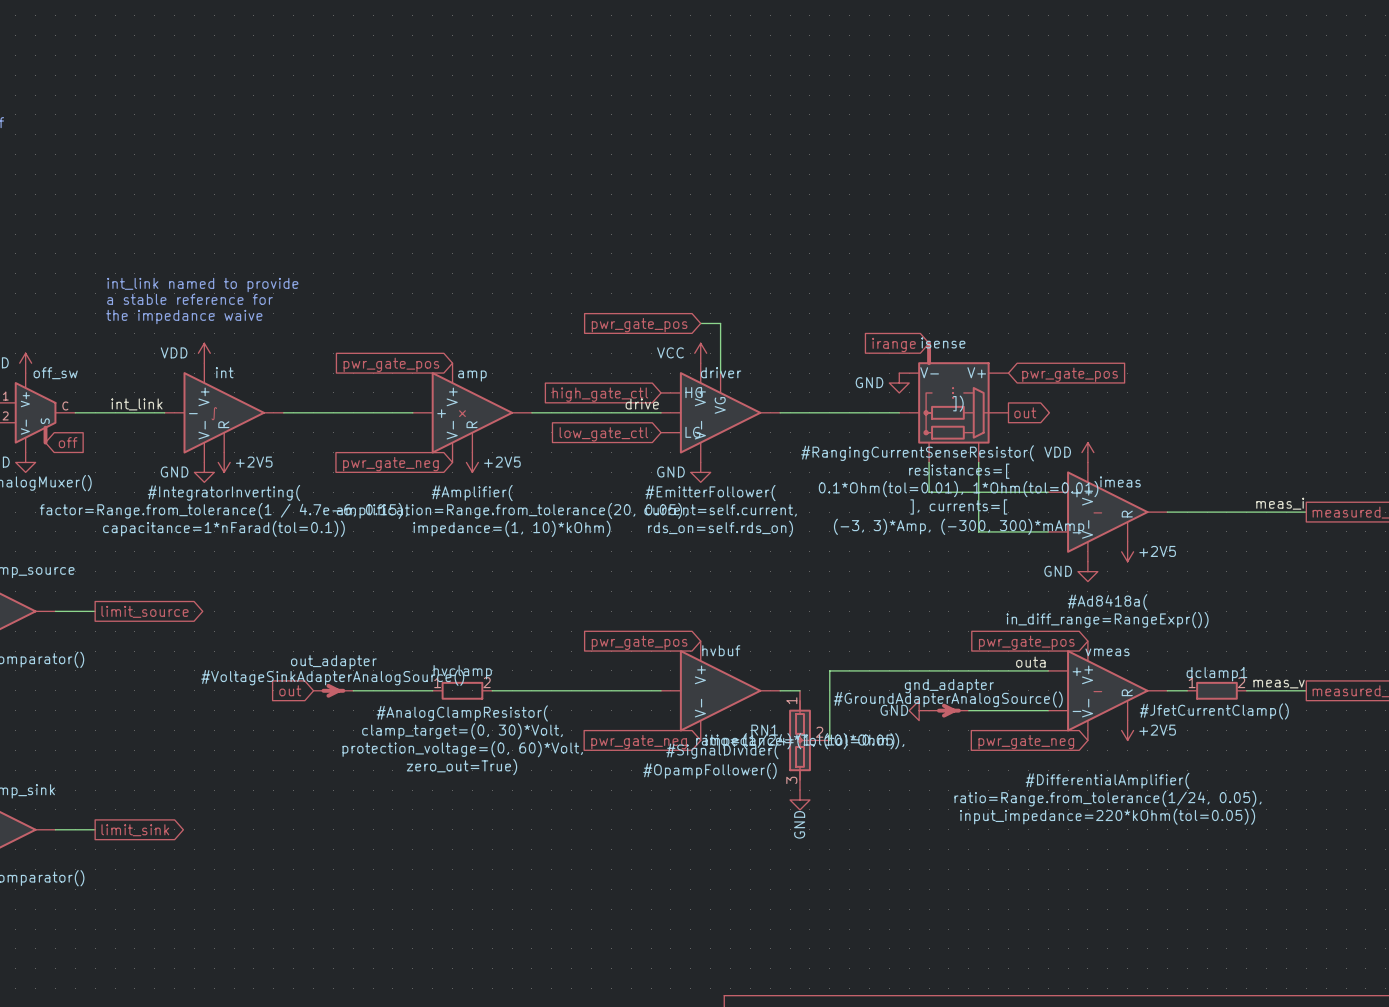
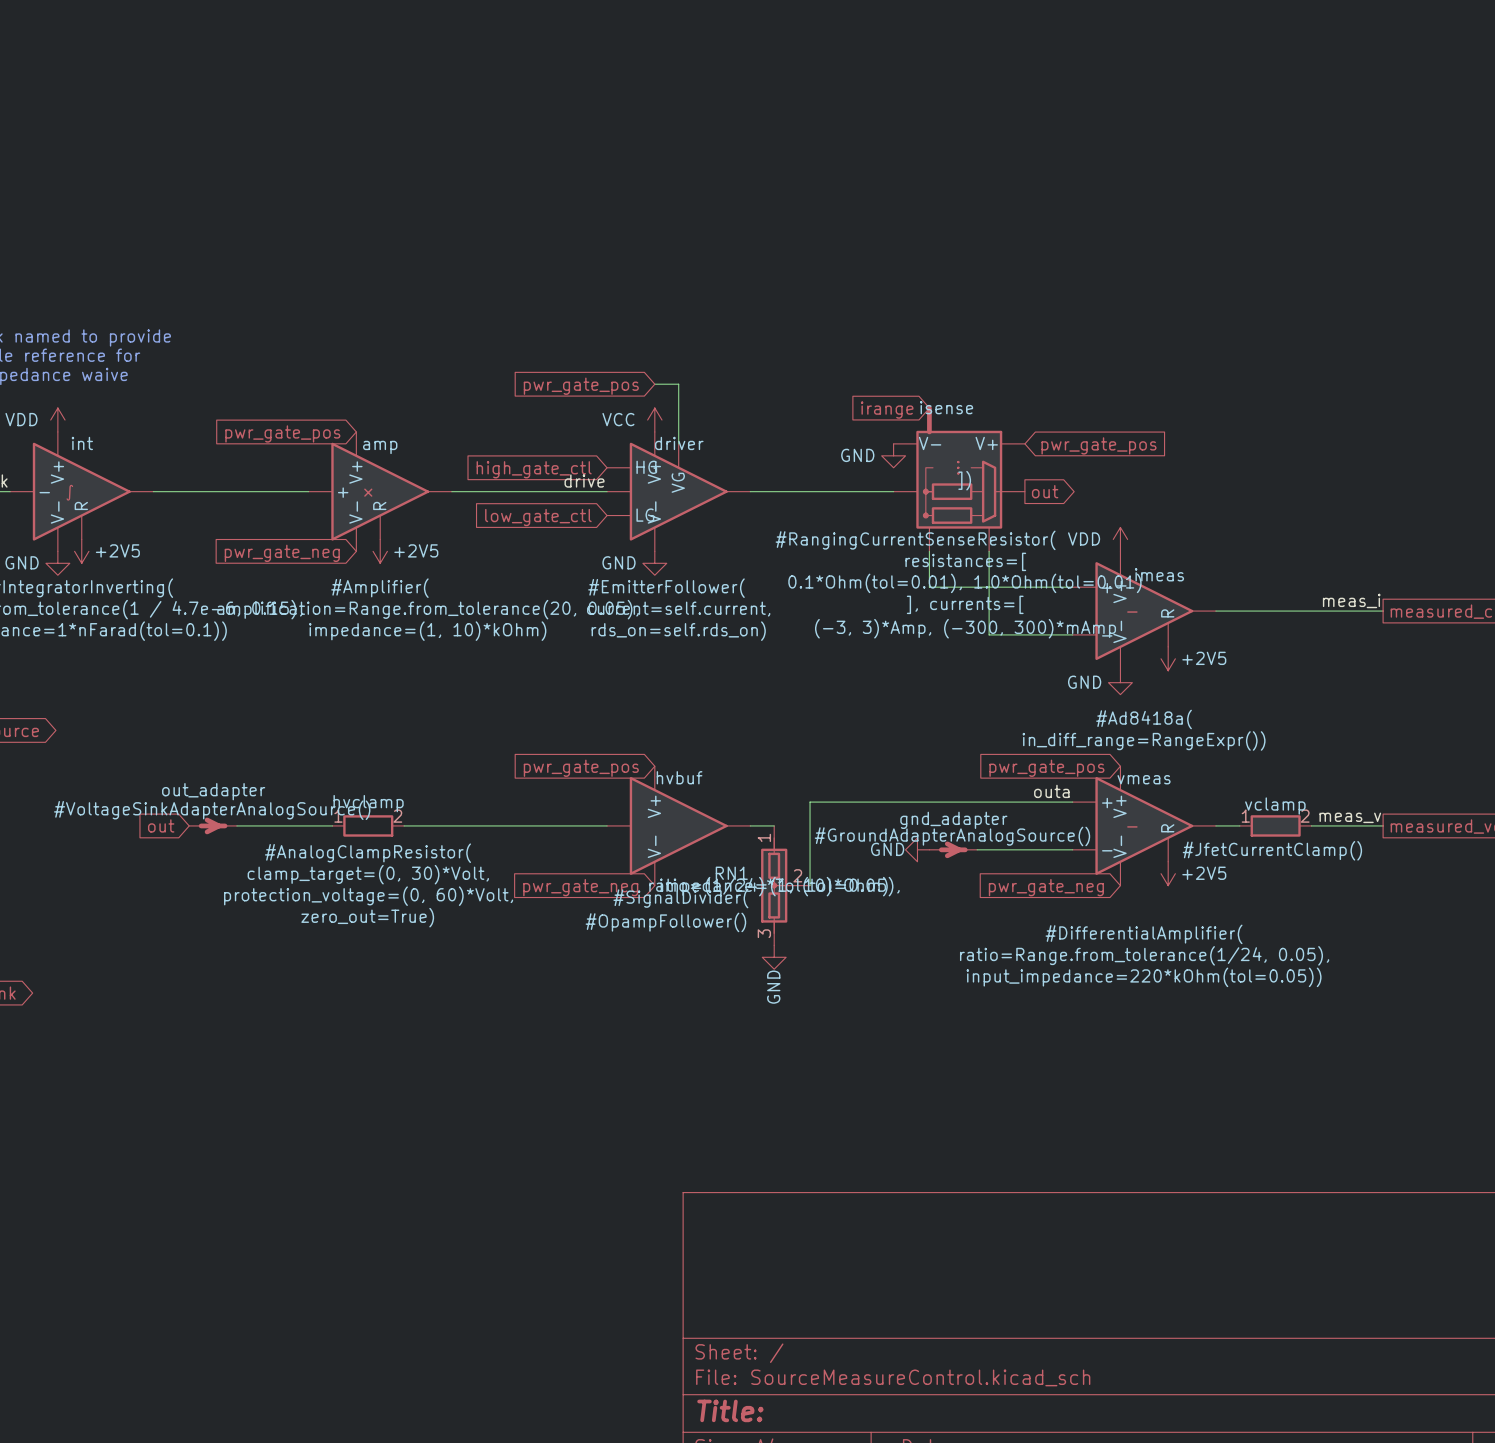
isense text: 0.1*Ohm(tol=0.01), 1*Ohm(tol=0.01) (958, 489) -> 0.1*Ohm(tol=0.01), 1.0*Ohm(tol=0.01) (964, 583)
dclamp1 name: dclamp1 (1216, 674) -> vclamp (1275, 806)

